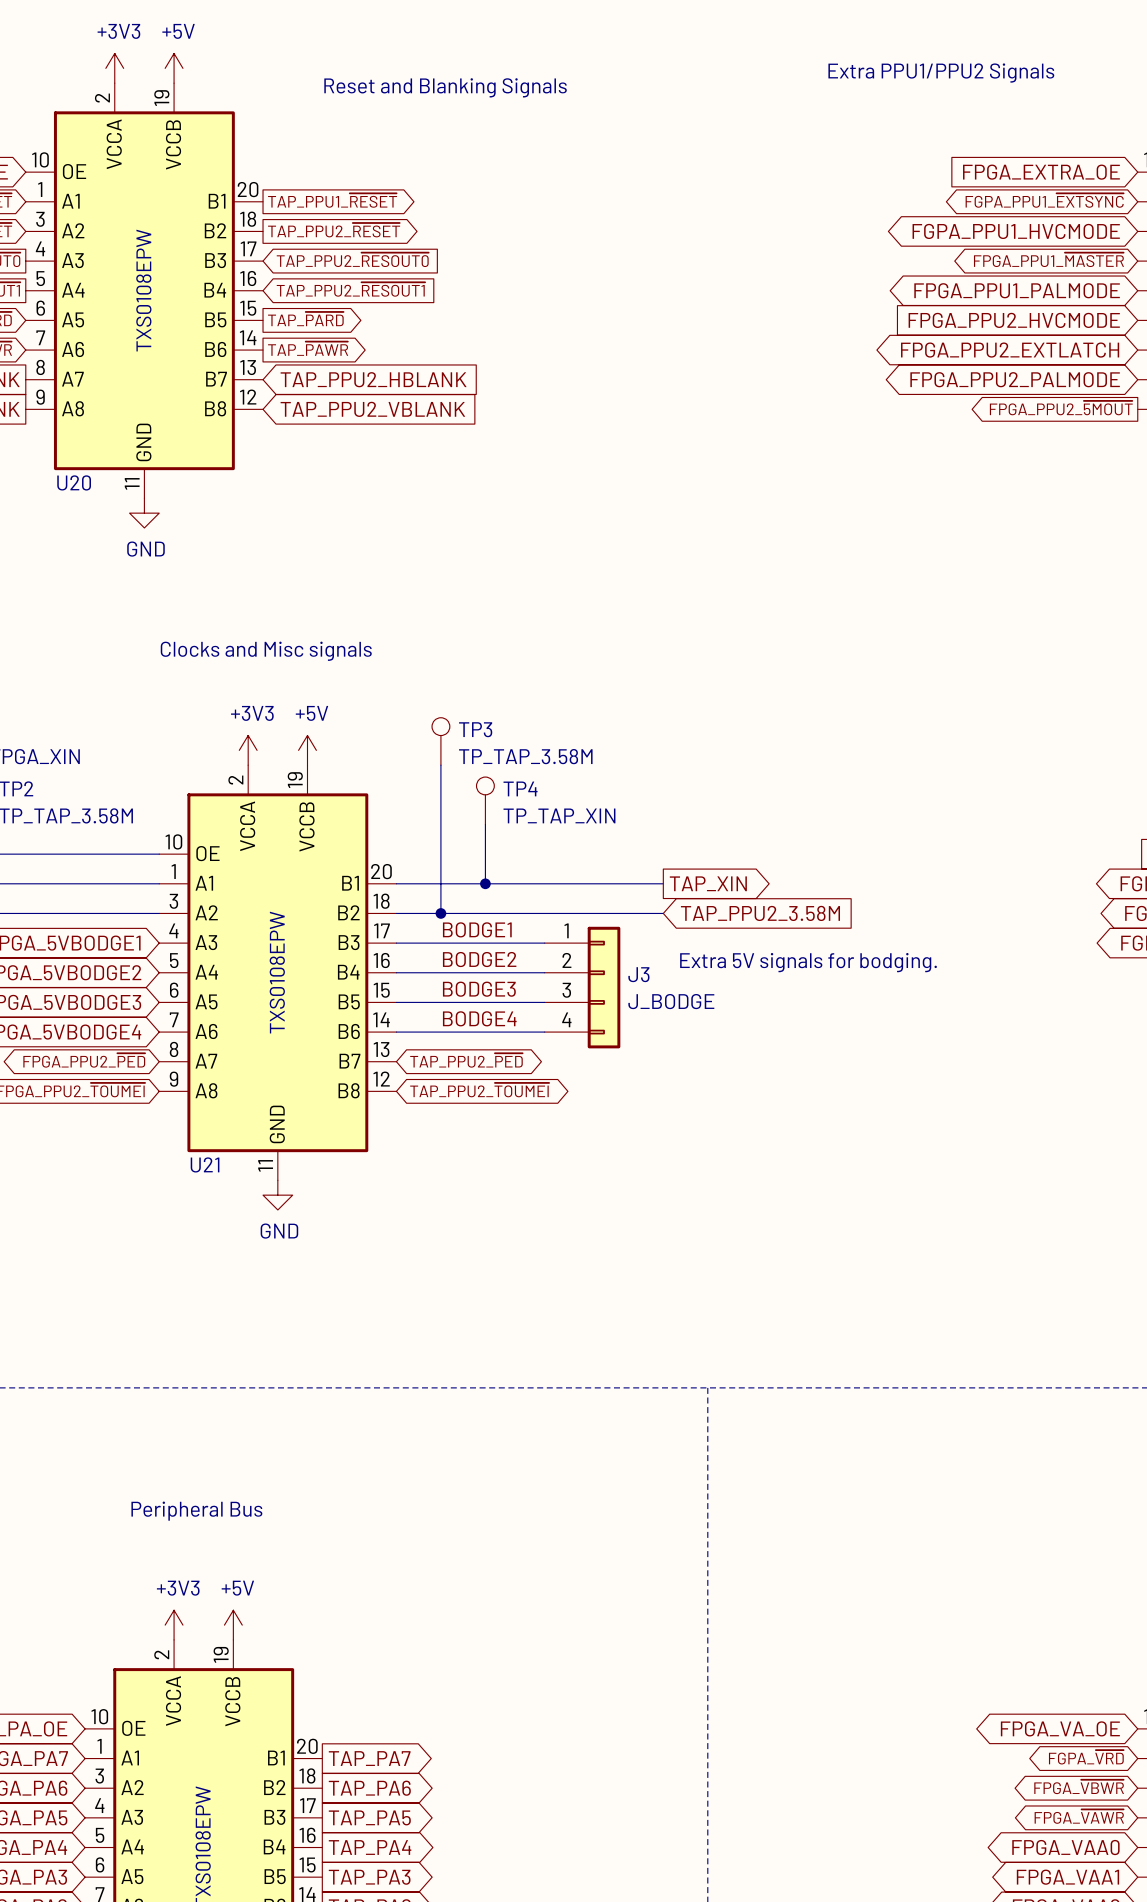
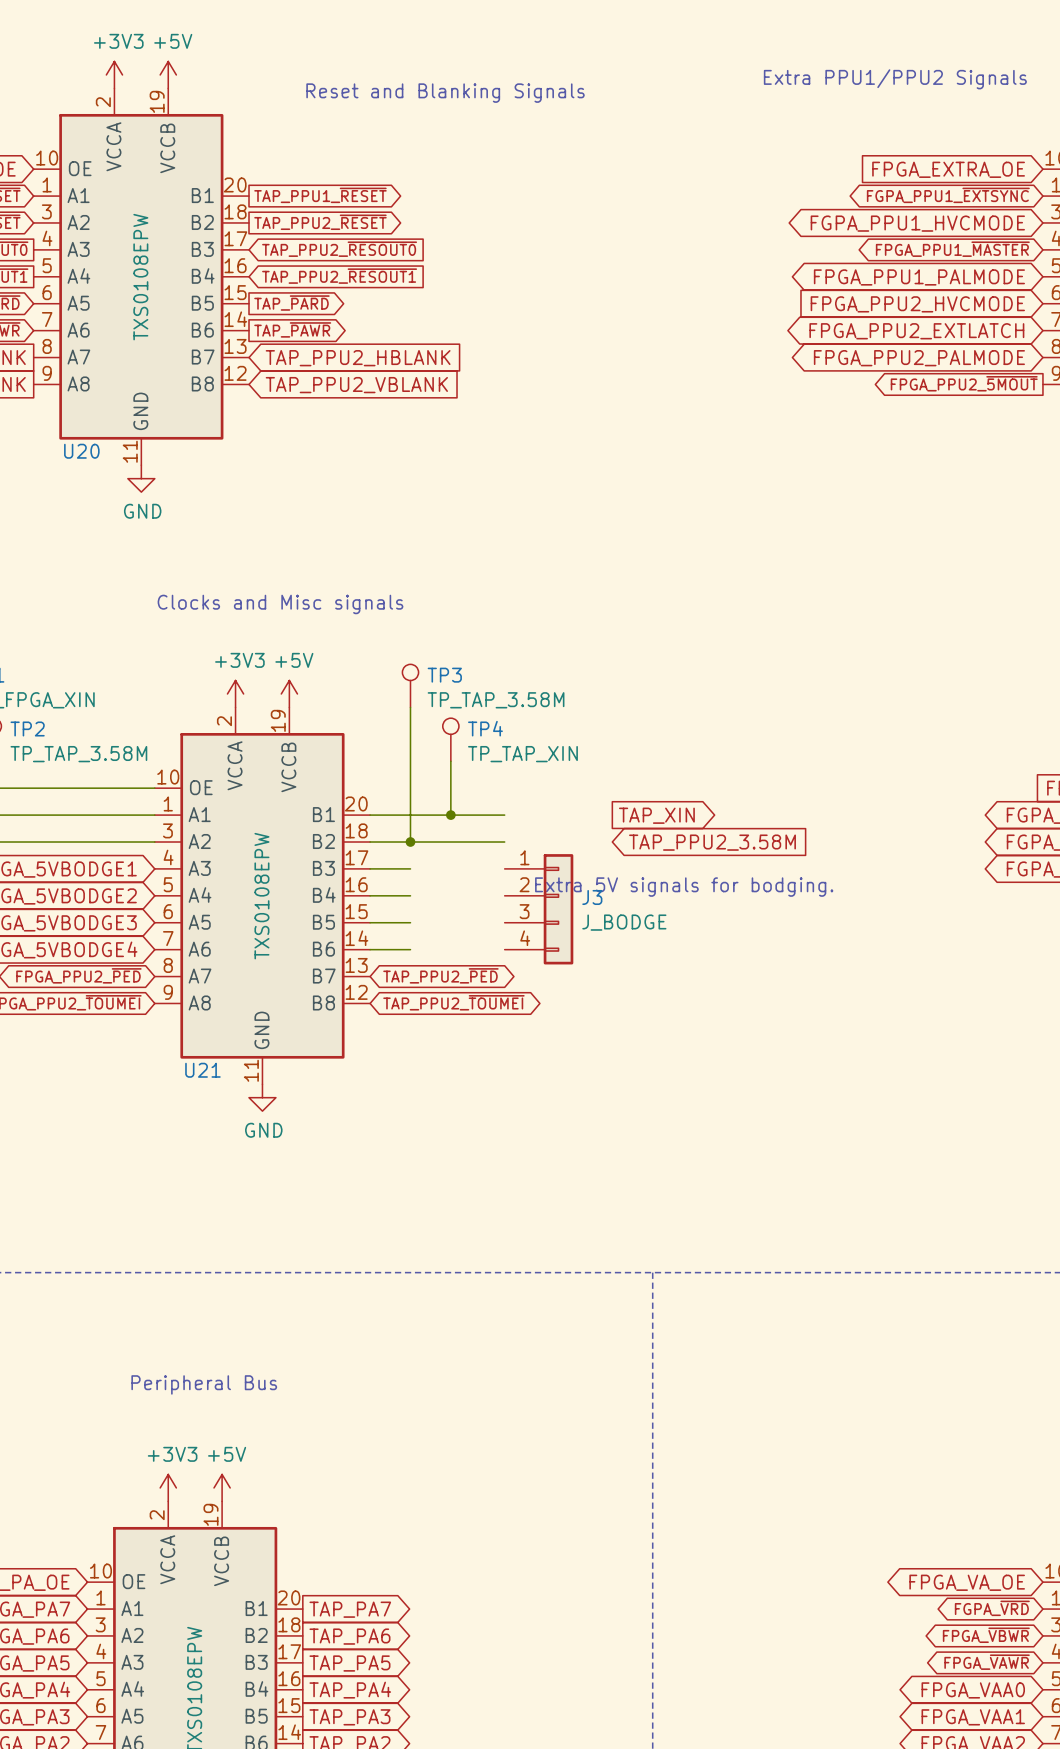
wire: (544, 883) (663, 883) -> none
wire: (544, 913) (663, 913) -> none
label: BODGE1 (477, 929) -> none
wire: (440, 943) (544, 943) -> none
label: BODGE2 (479, 959) -> none
text position: Extra 5V signals for bodging. (808, 962) -> Extra 5V signals for bodging. (684, 887)
wire: (440, 972) (544, 972) -> none
label: BODGE3 (479, 989) -> none
wire: (440, 1002) (544, 1002) -> none
label: BODGE4 (479, 1018) -> none
wire: (440, 1032) (544, 1032) -> none

